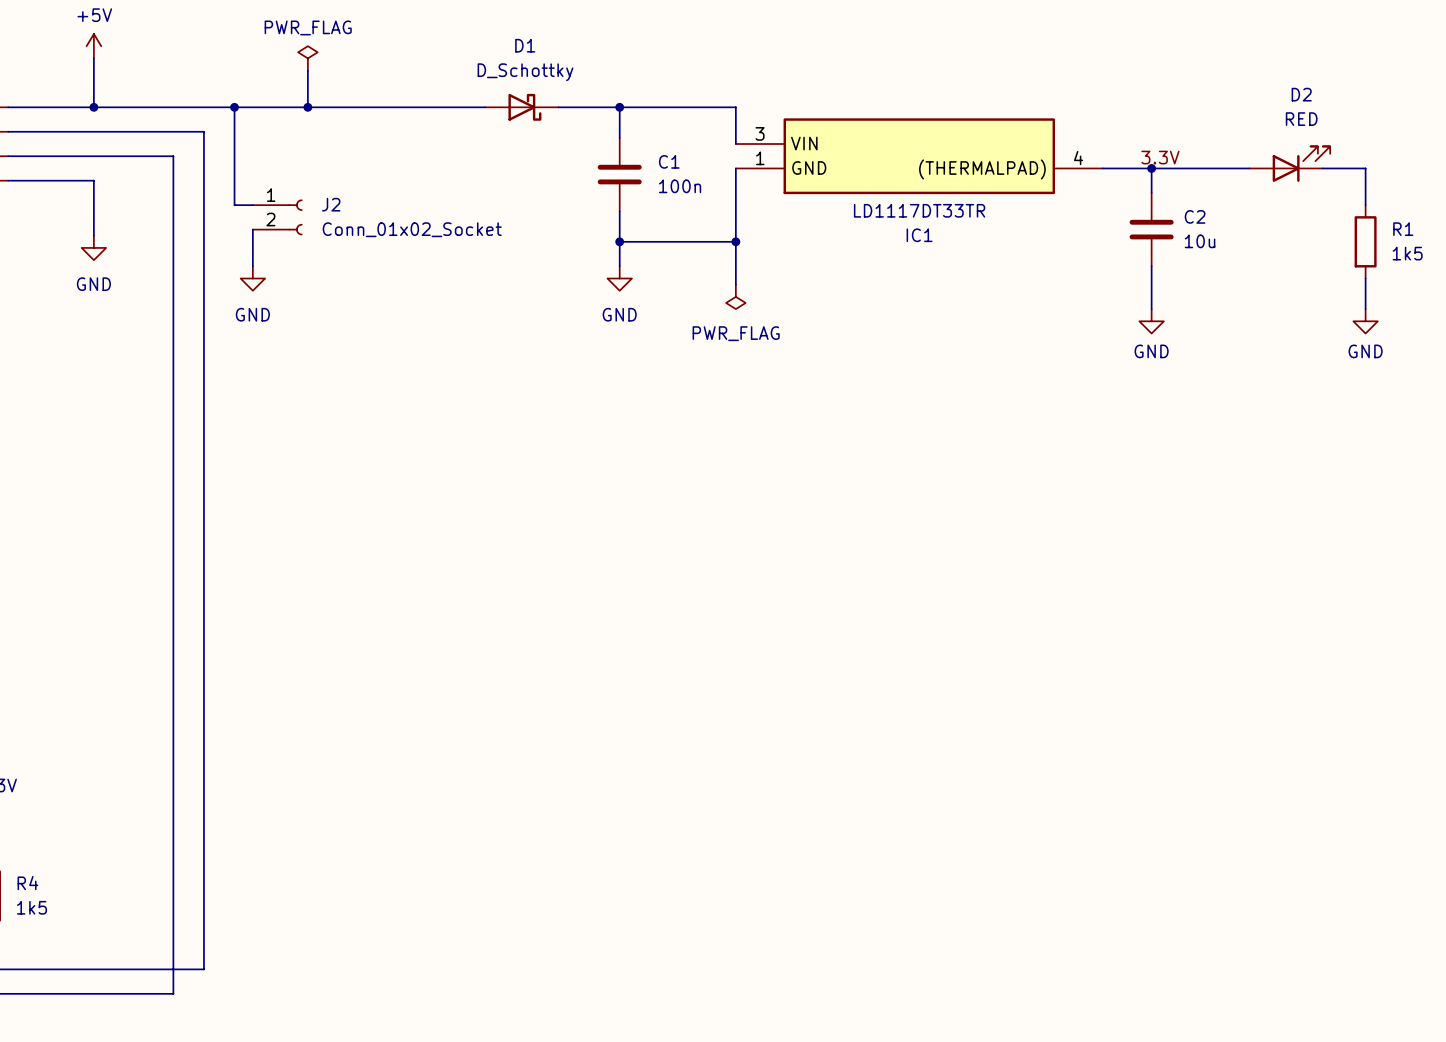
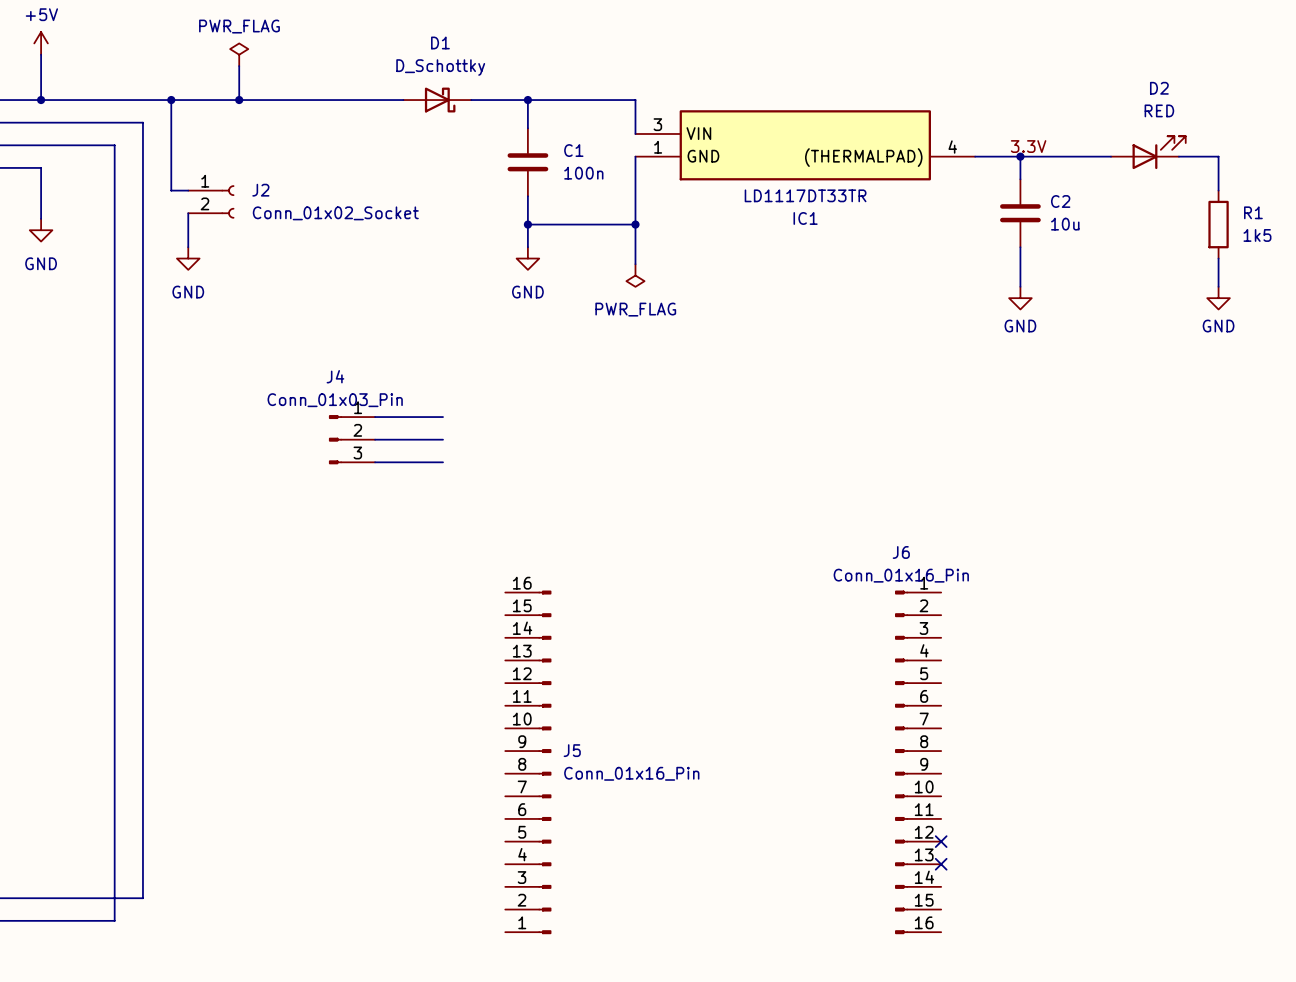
wire: none -> (375, 417) (443, 417)
J4: none -> Conn_01x03_Pin (352, 439)
wire: none -> (375, 439) (443, 439)
wire: none -> (375, 462) (443, 462)
J5: none -> Conn_01x16_Pin (528, 762)
J6: none -> Conn_01x16_Pin (918, 762)
no-connect mark: none -> (941, 841)
no-connect mark: none -> (941, 864)

